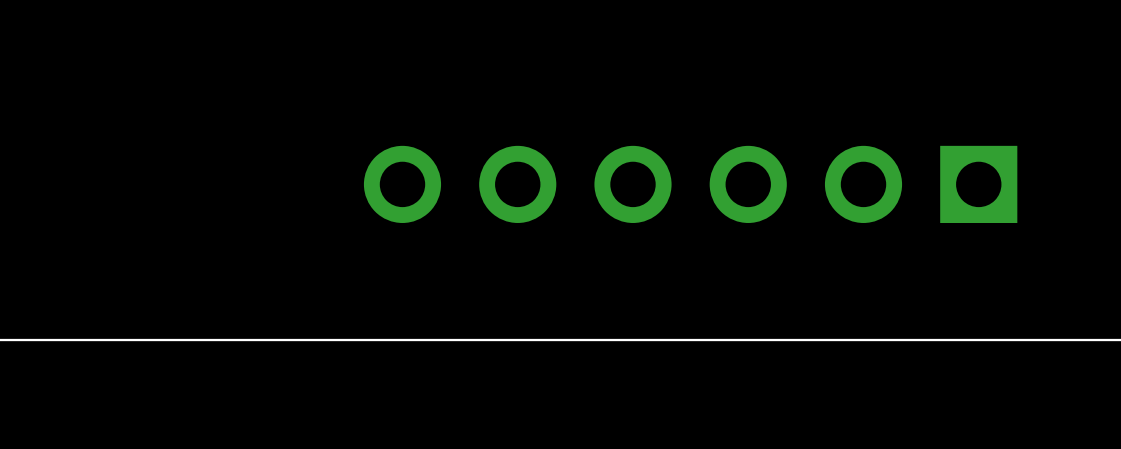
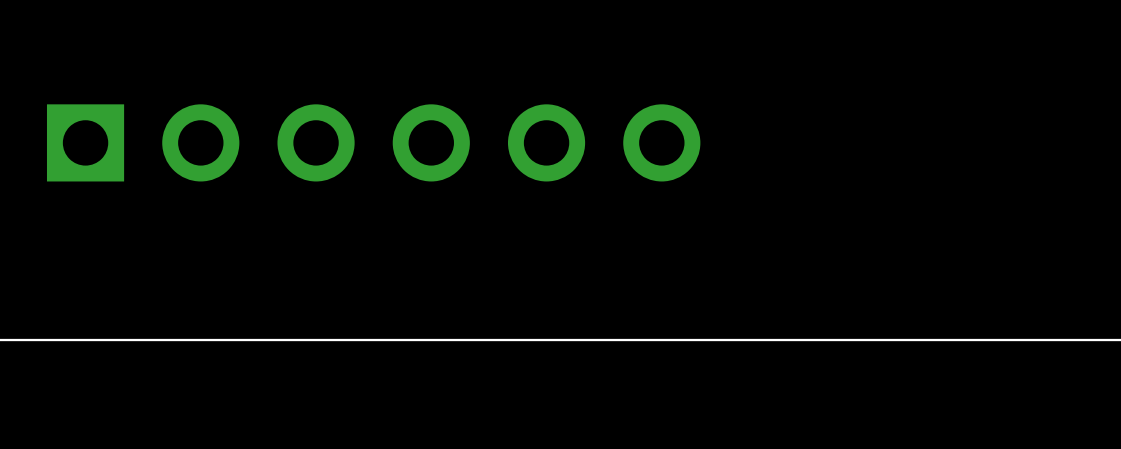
part rotation: 0° (690, 184) -> 180° (373, 142)

